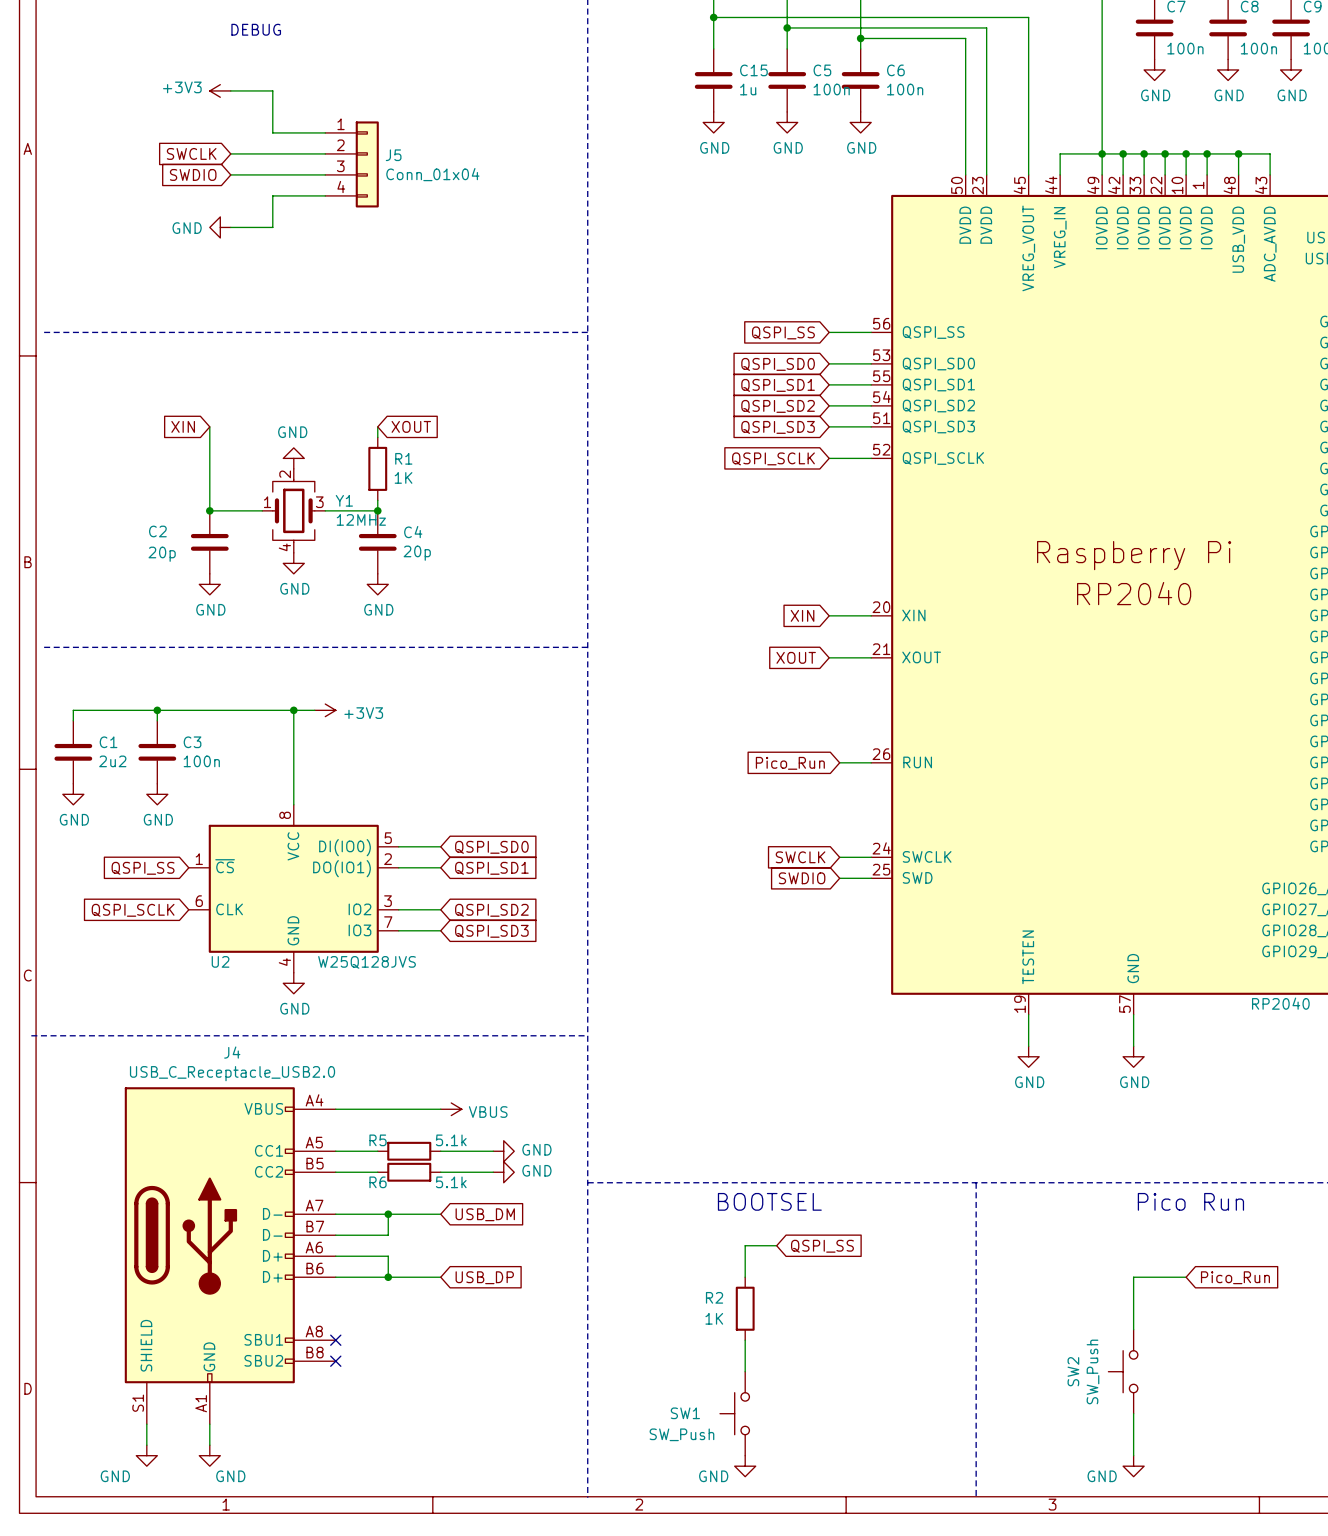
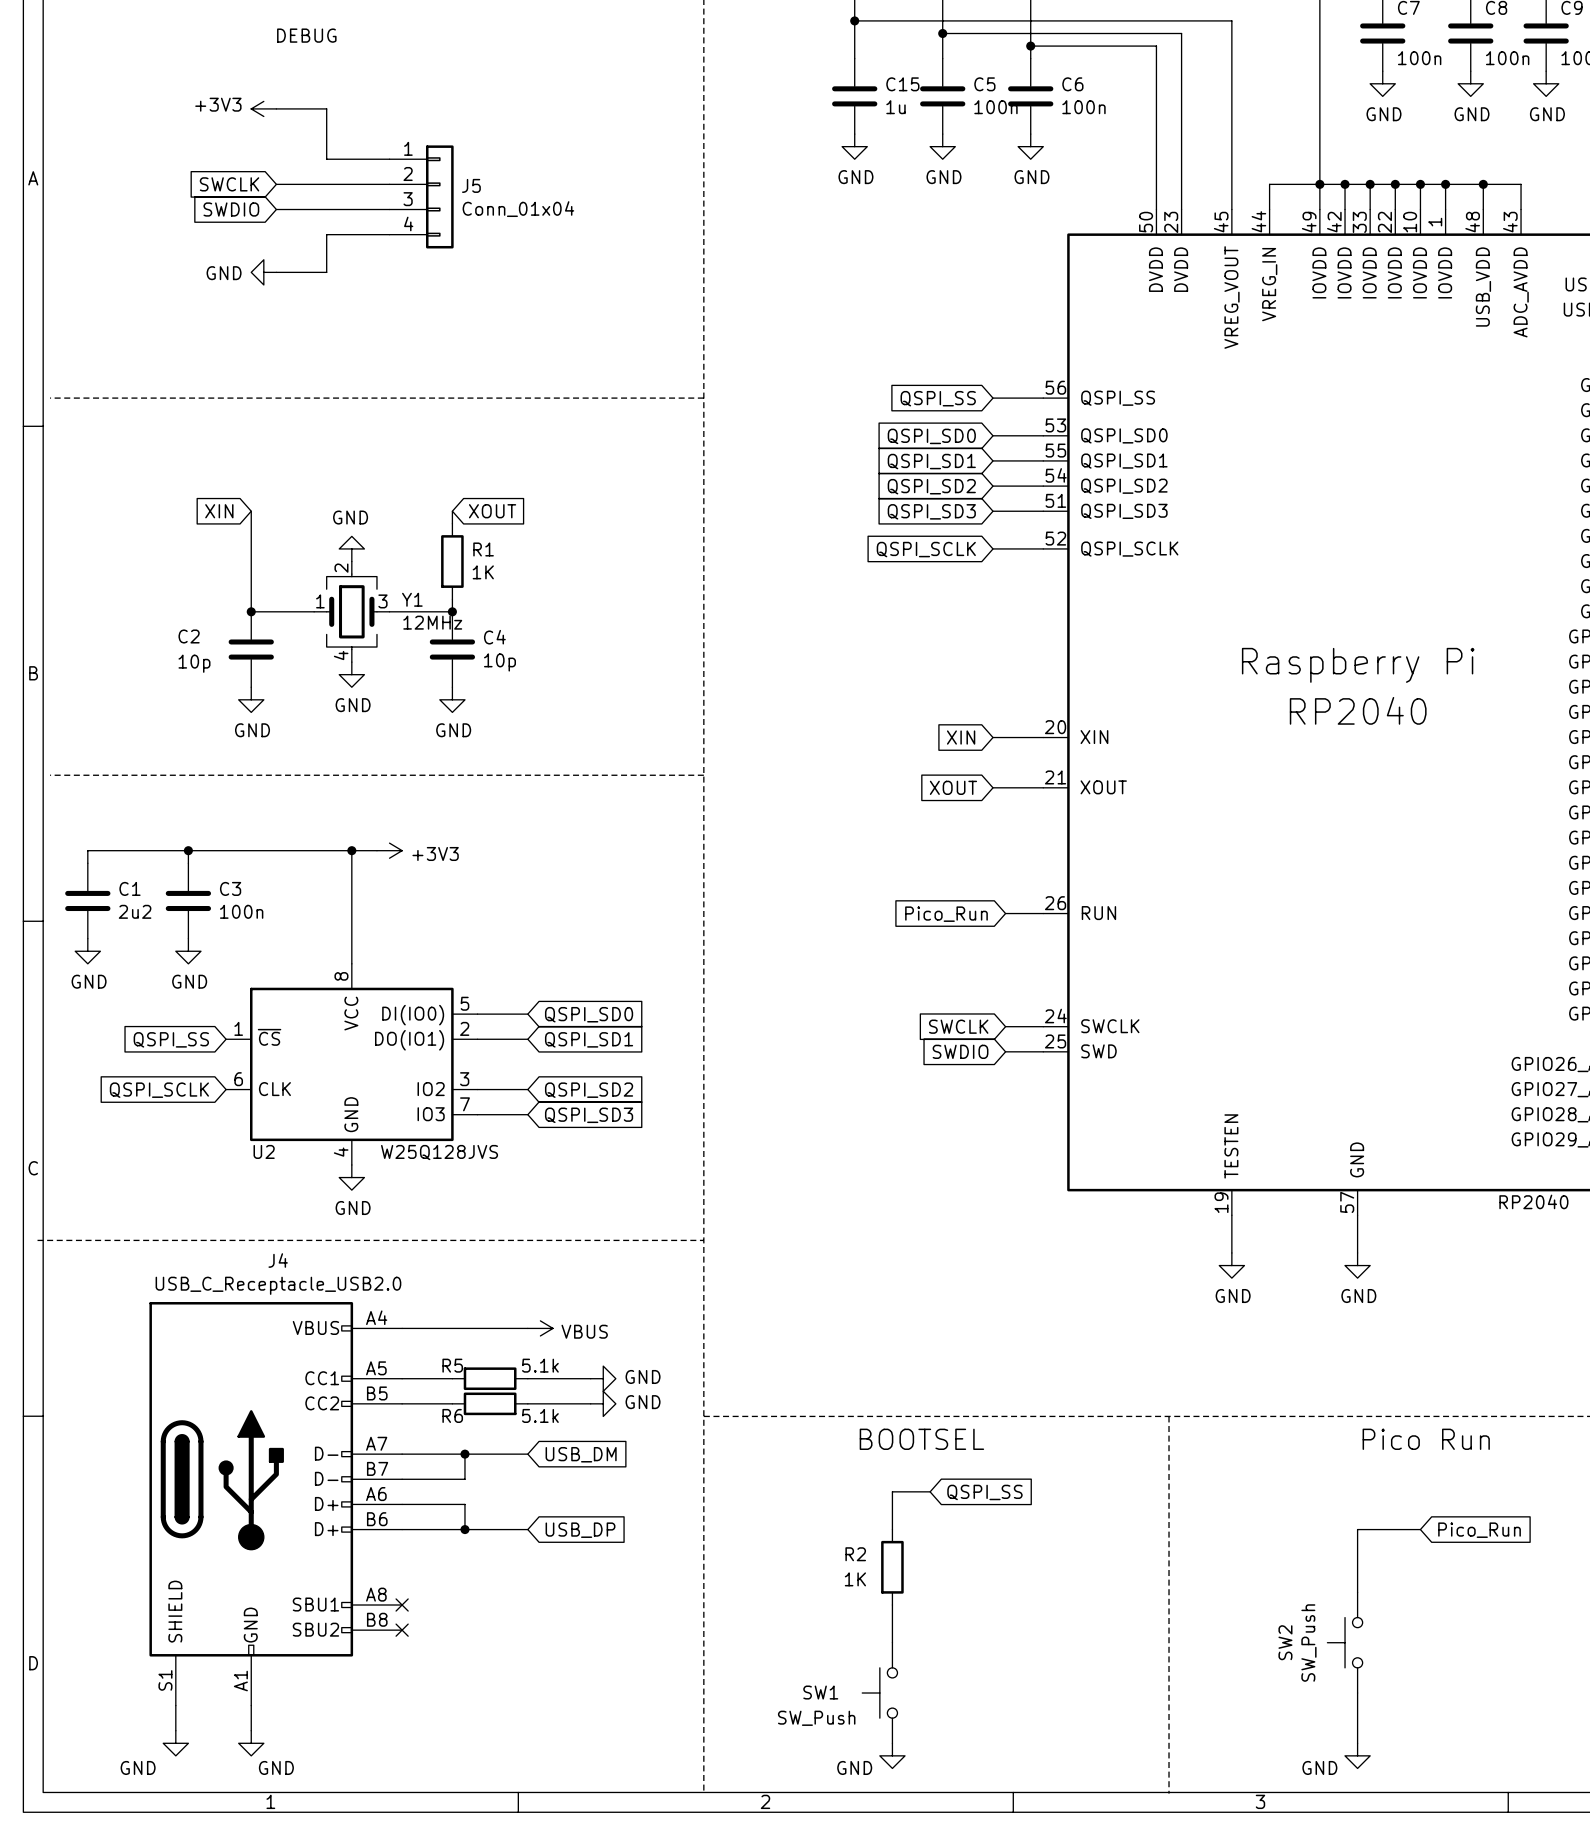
C4 value: 20p (417, 553) -> 10p (499, 662)
C2 value: 20p (162, 554) -> 10p (194, 663)

